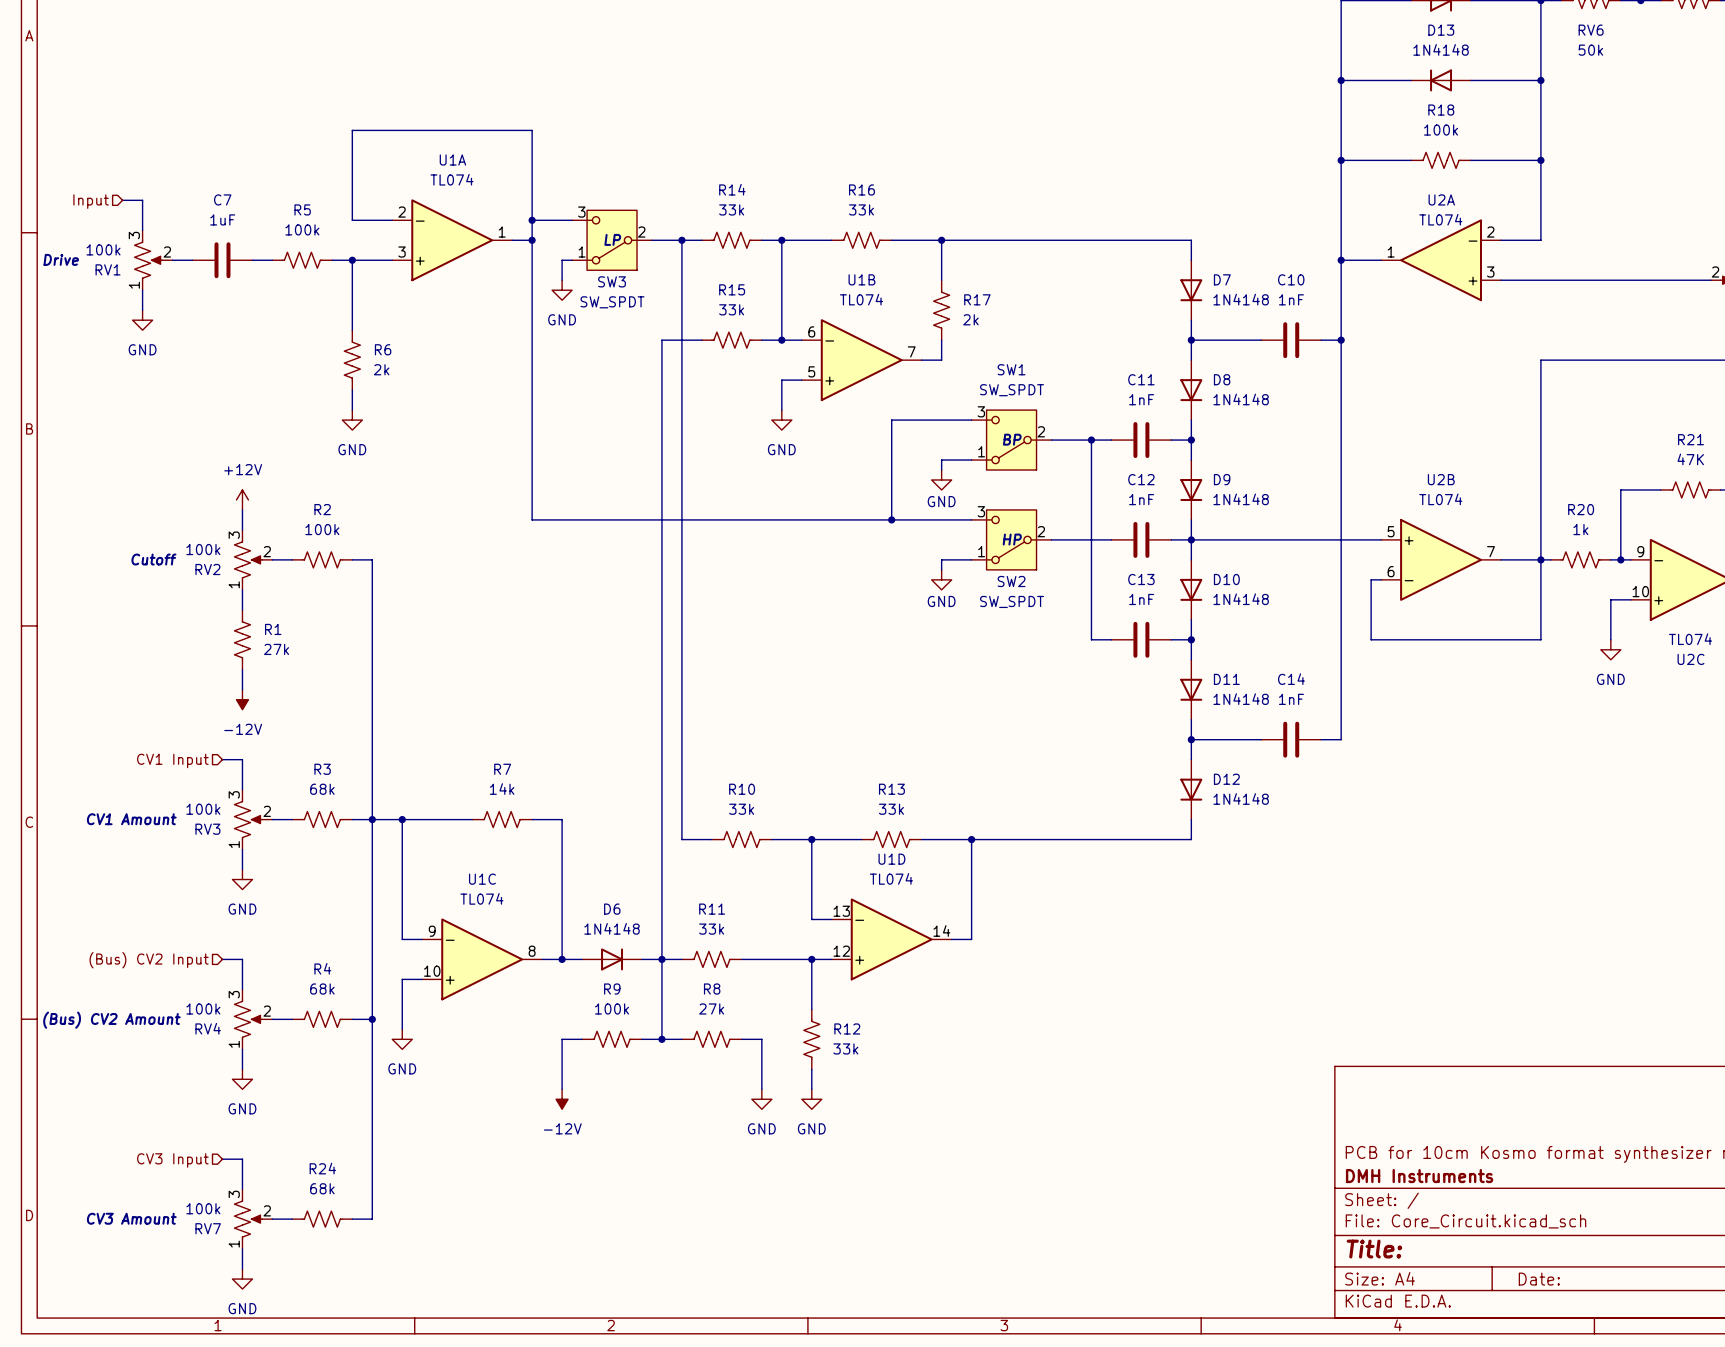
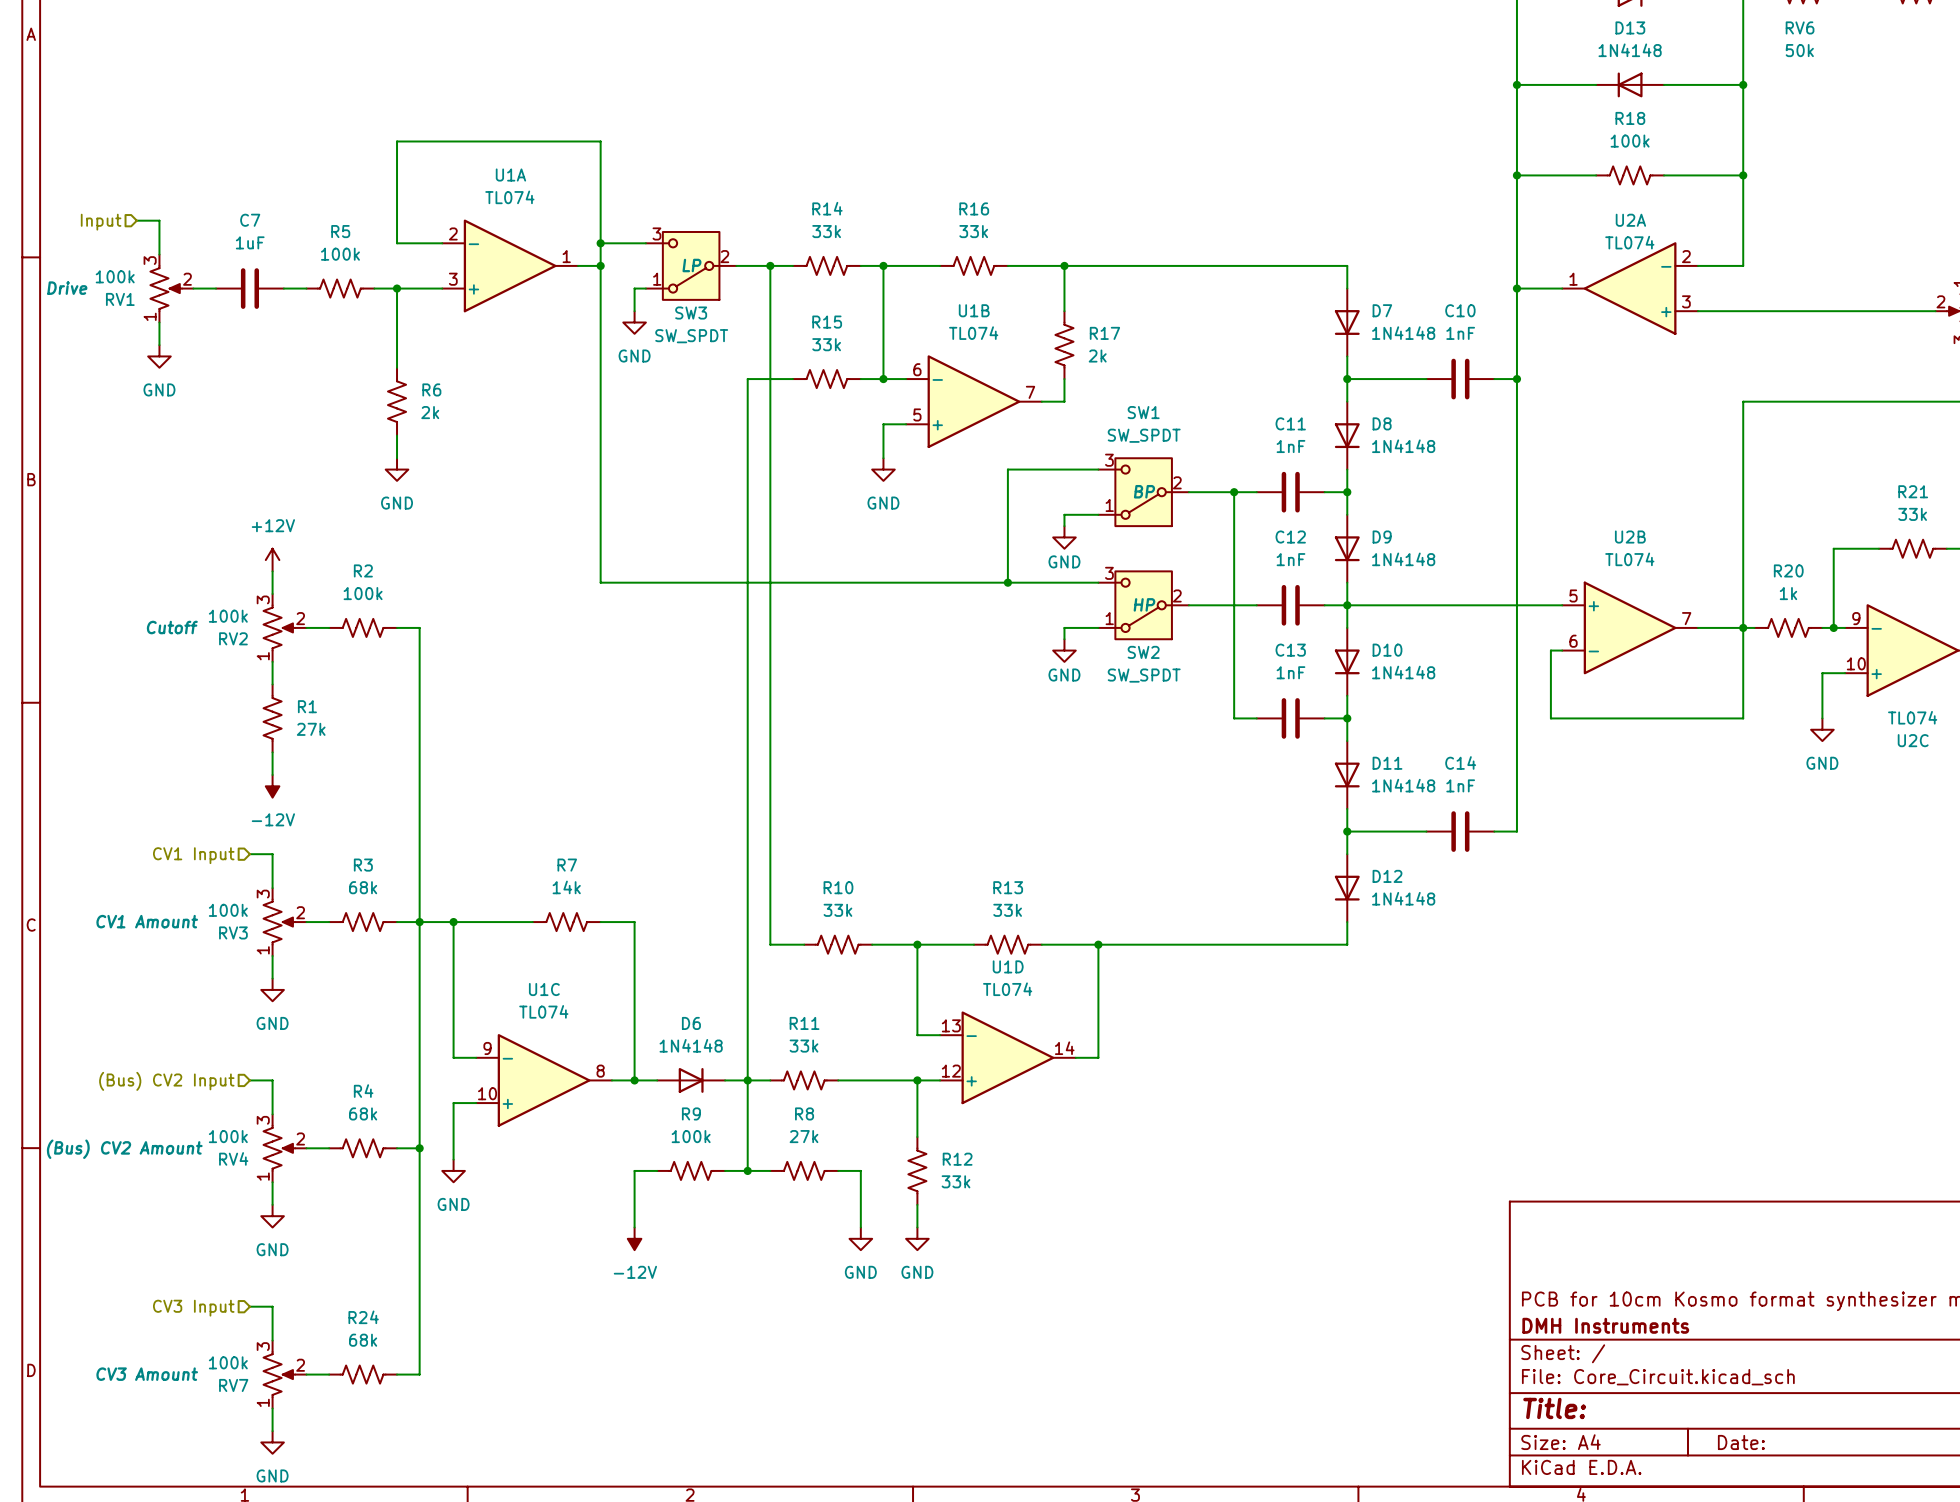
R21 value: 47K (1690, 459) -> 33k (1912, 514)

